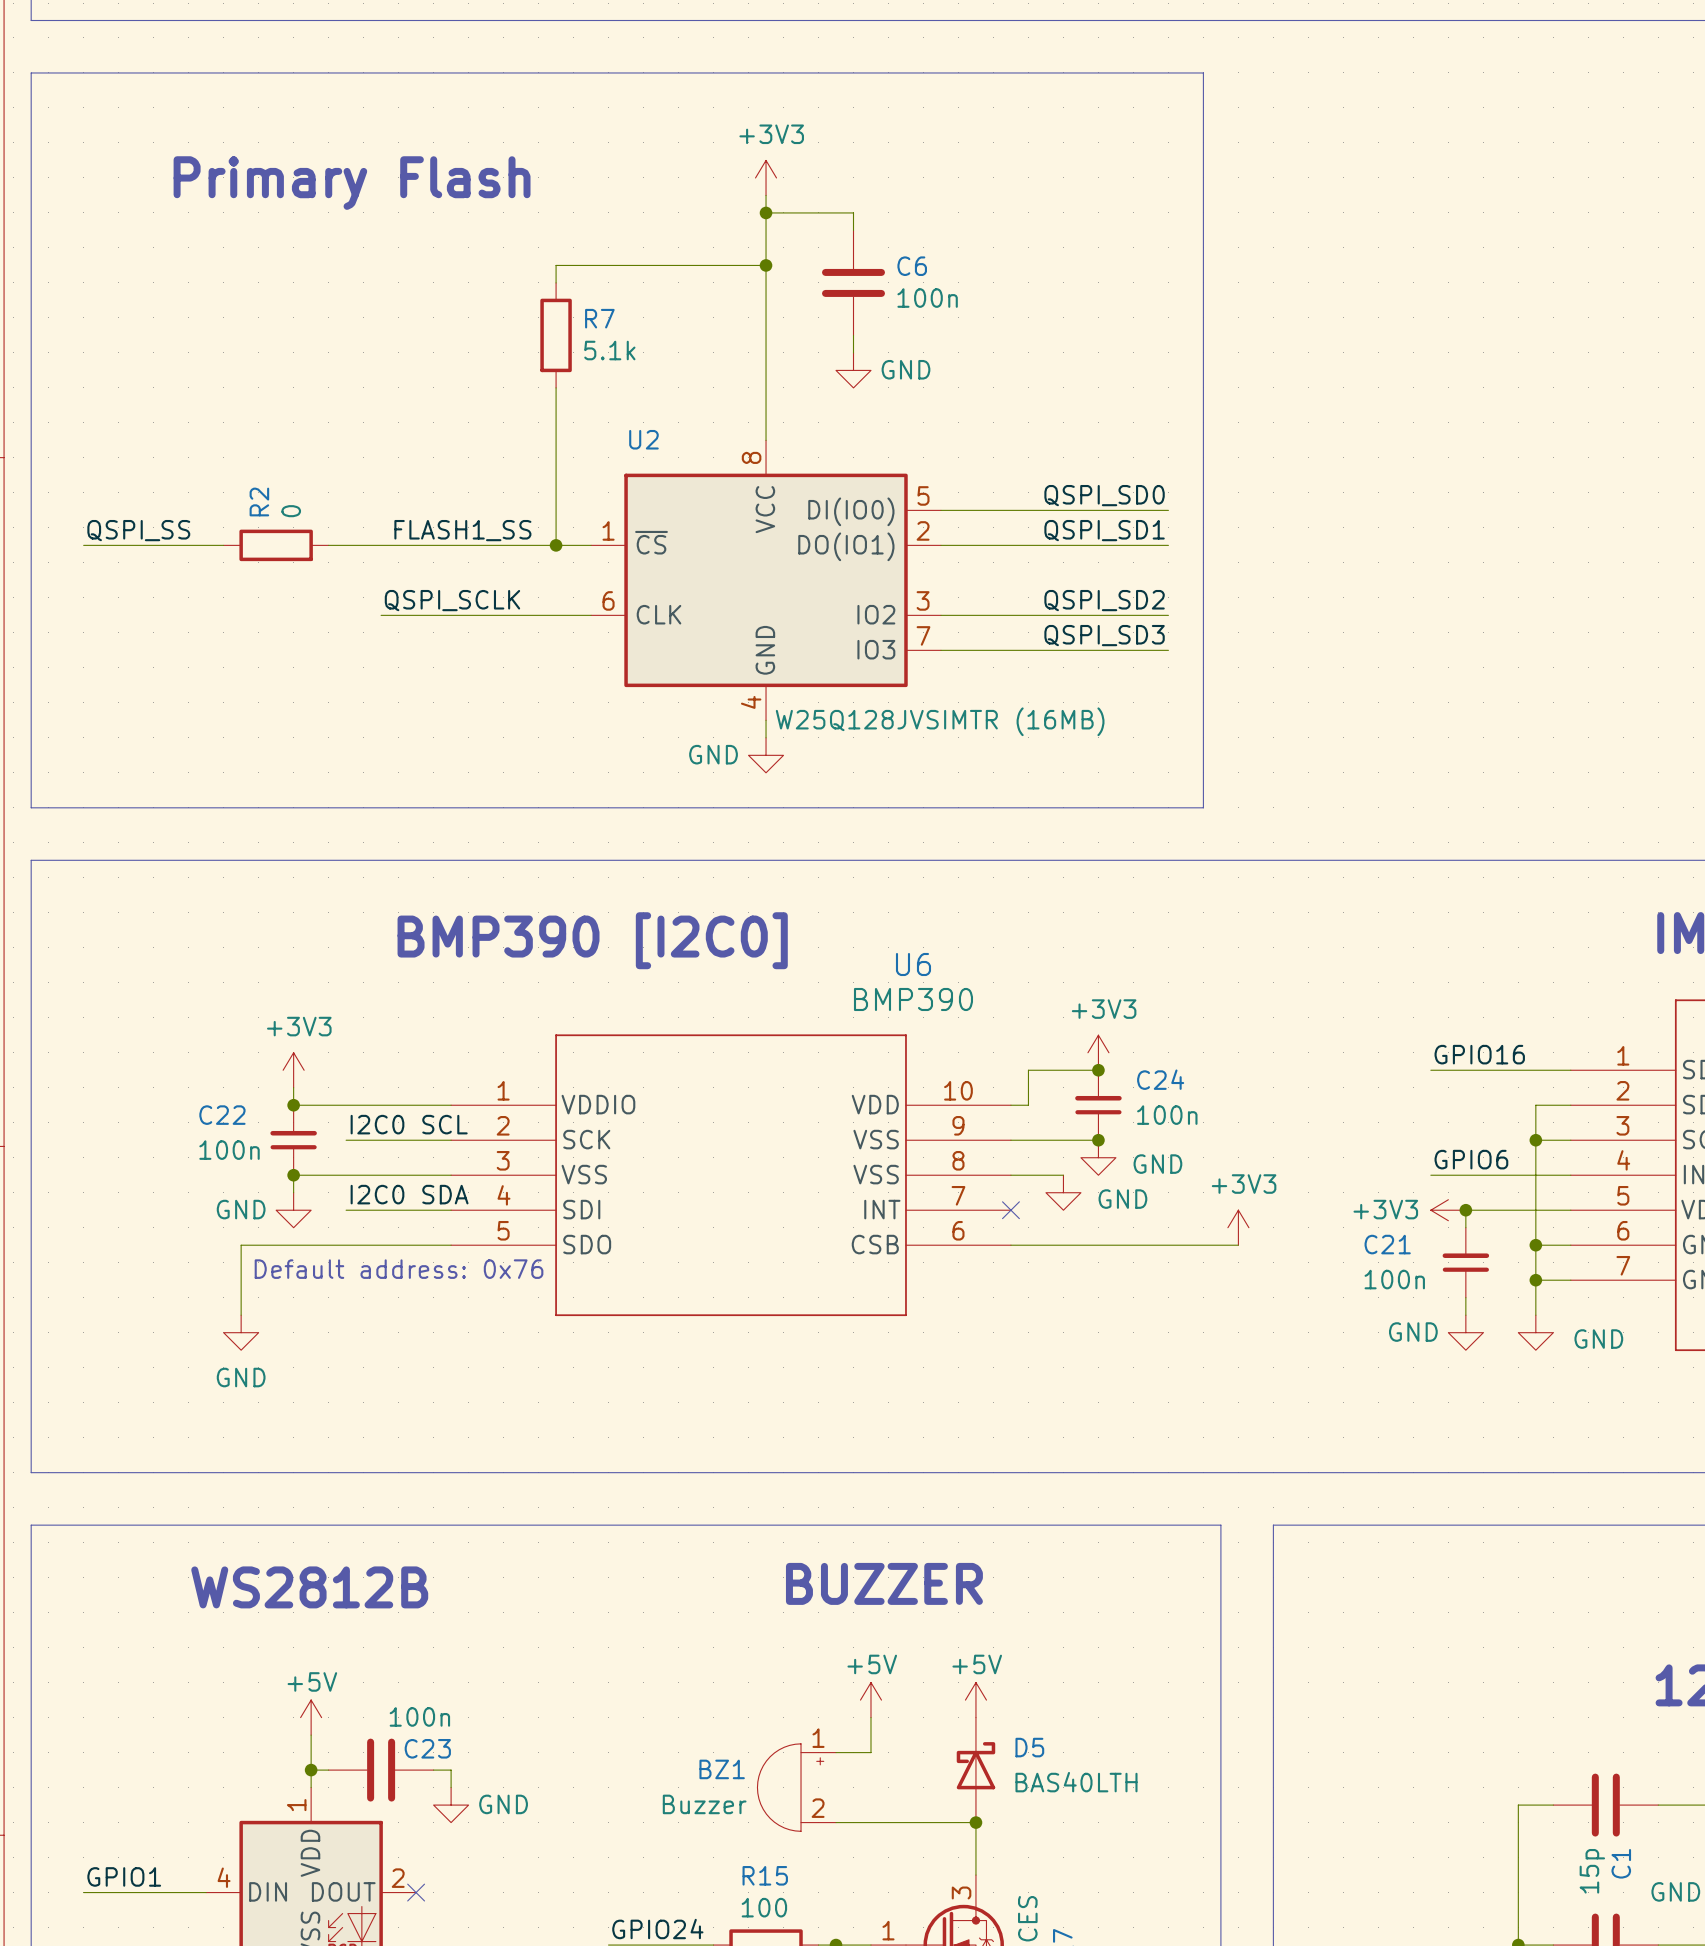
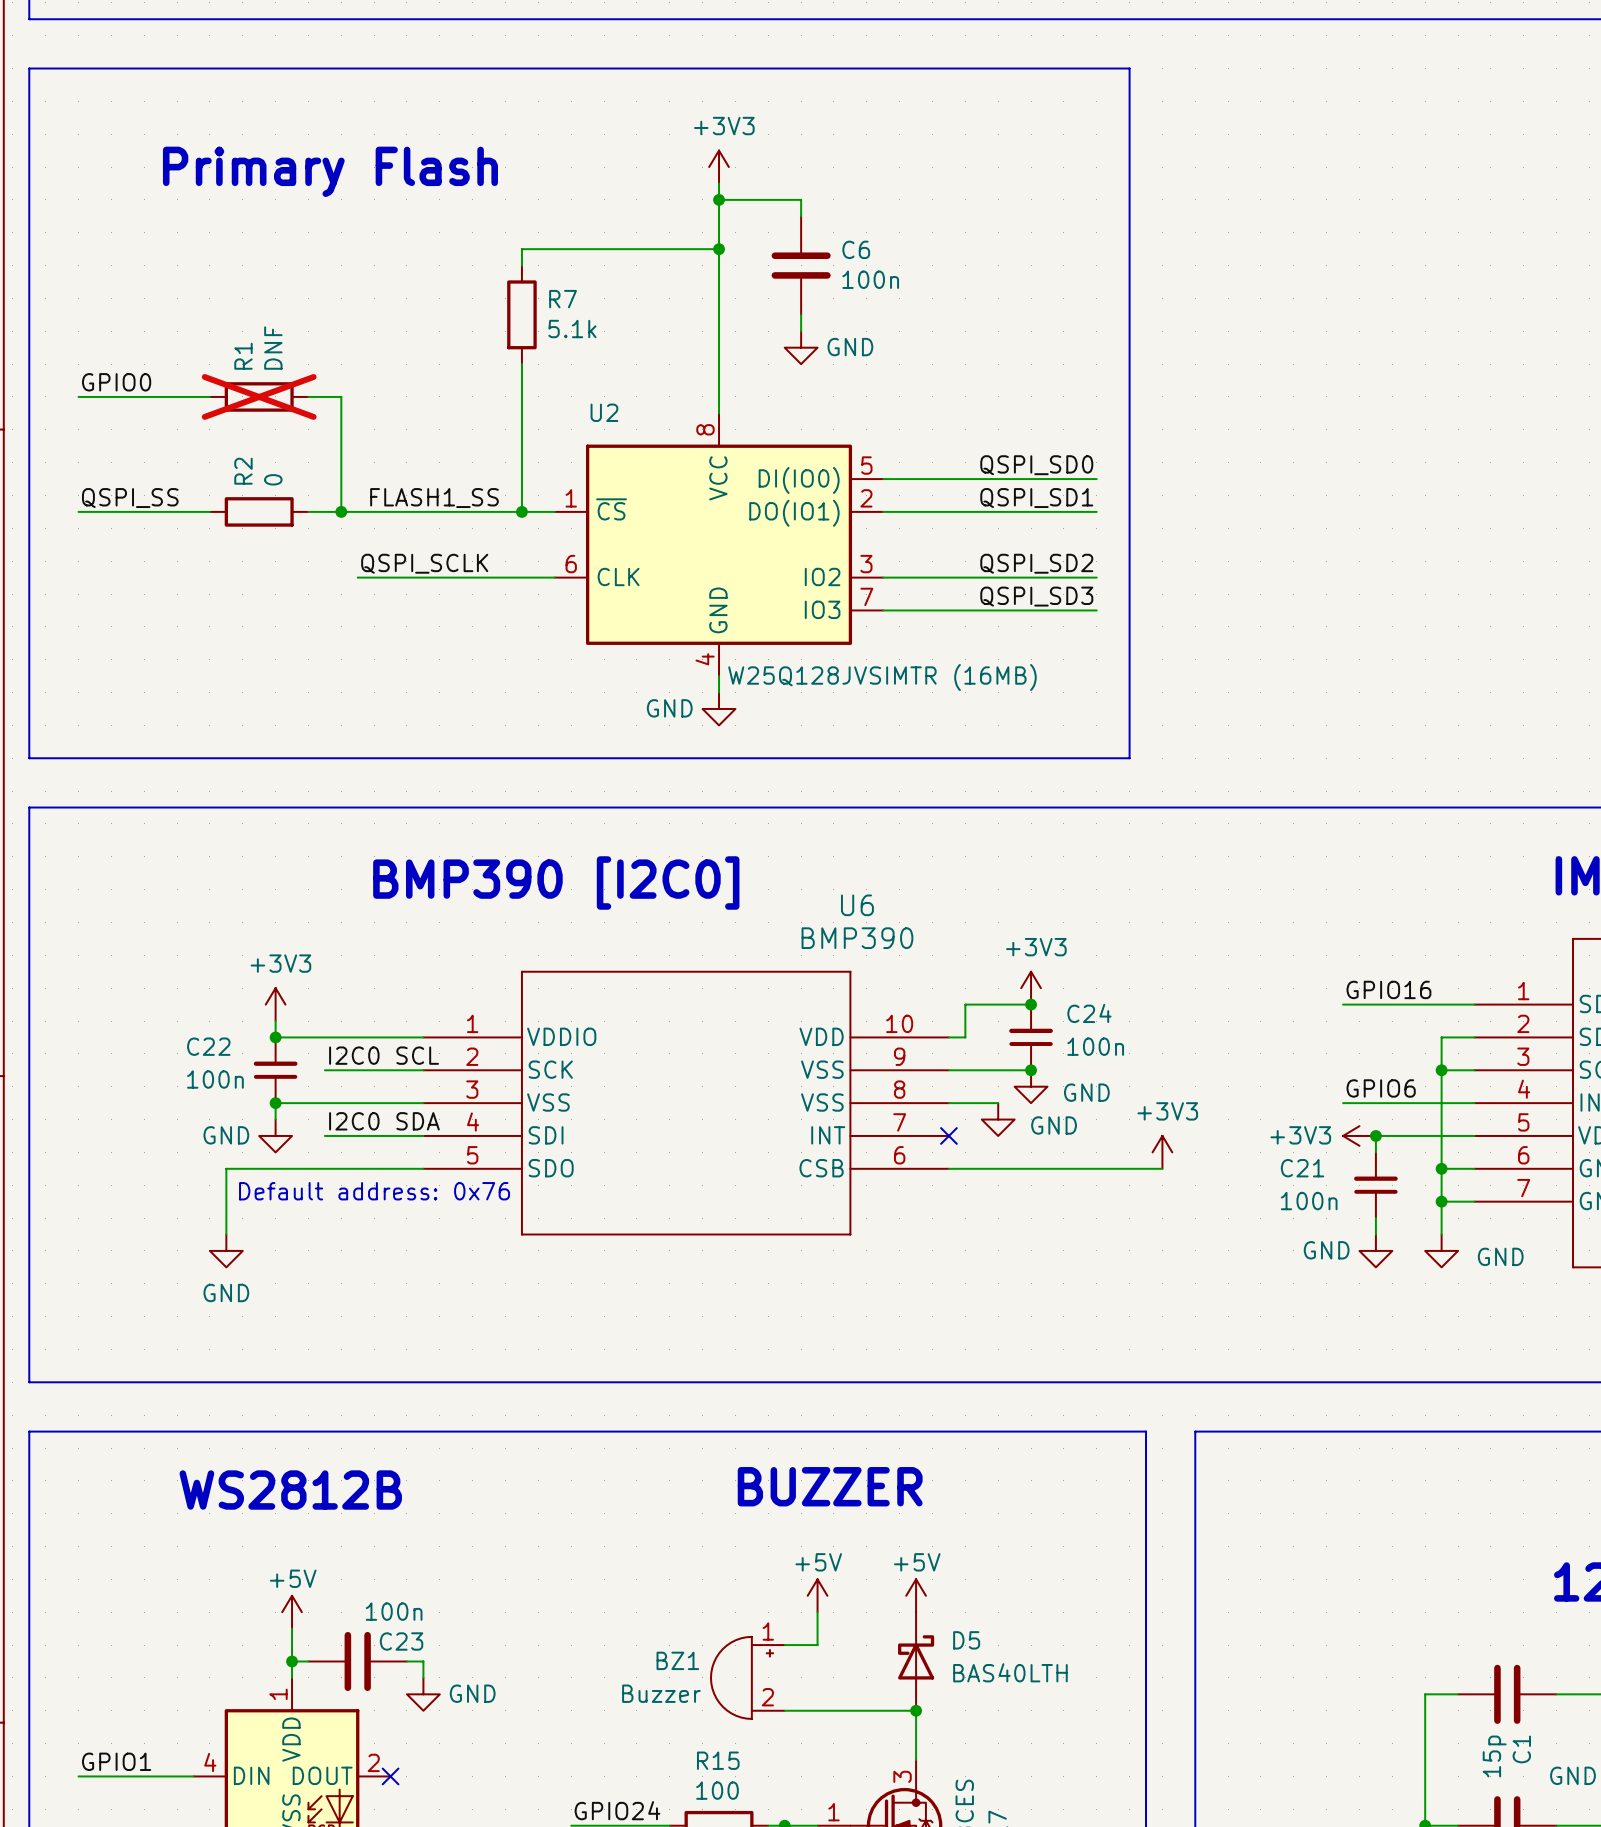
label: none -> GPIO0 (116, 382)
wire: none -> (78, 396) (209, 396)
R1: none -> DNF (259, 396)
wire: none -> (308, 396) (341, 396) (341, 511)
junction: none -> (341, 511)

